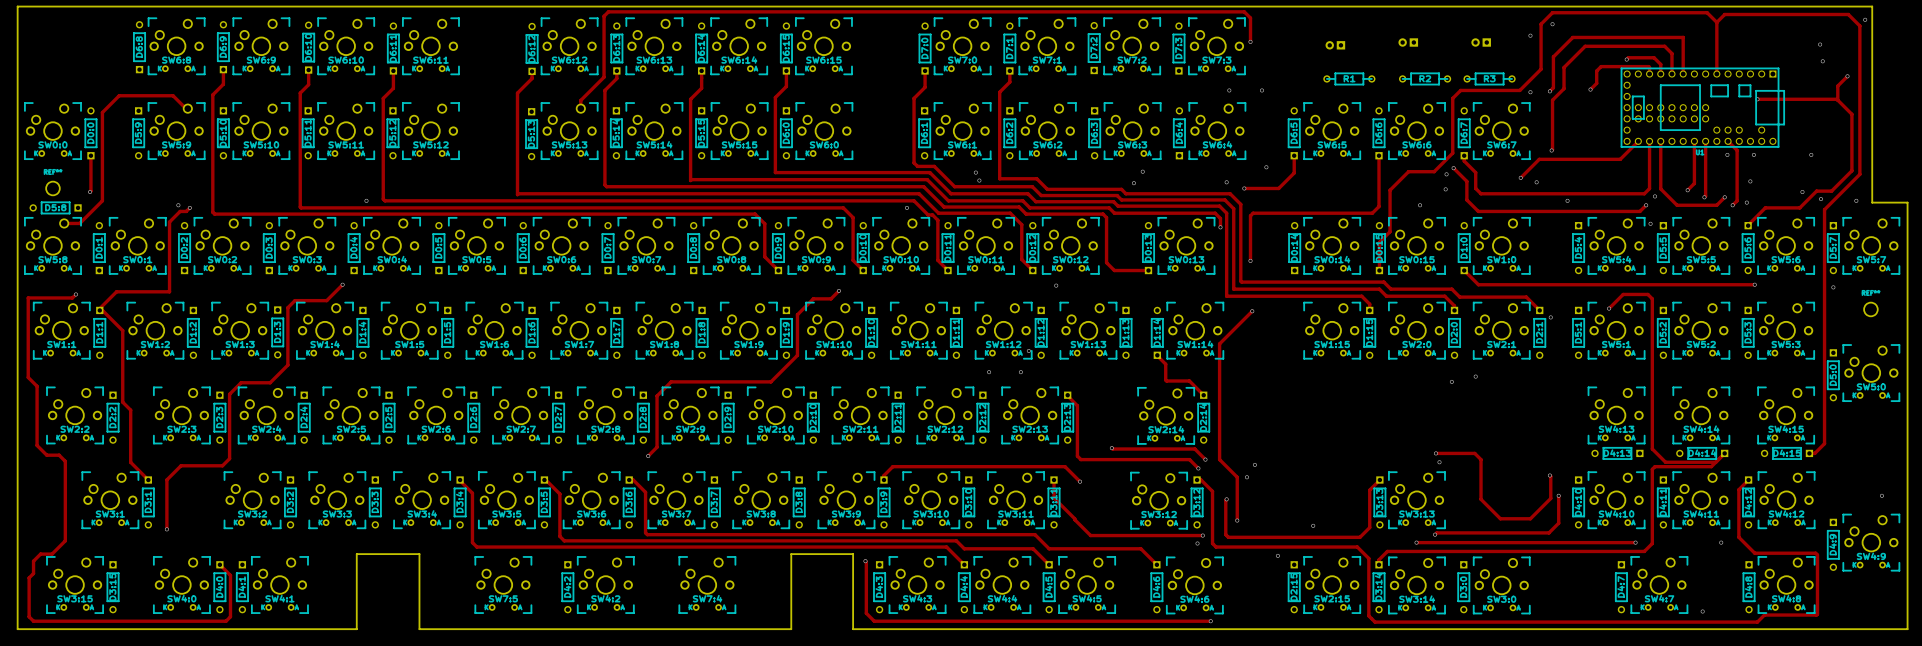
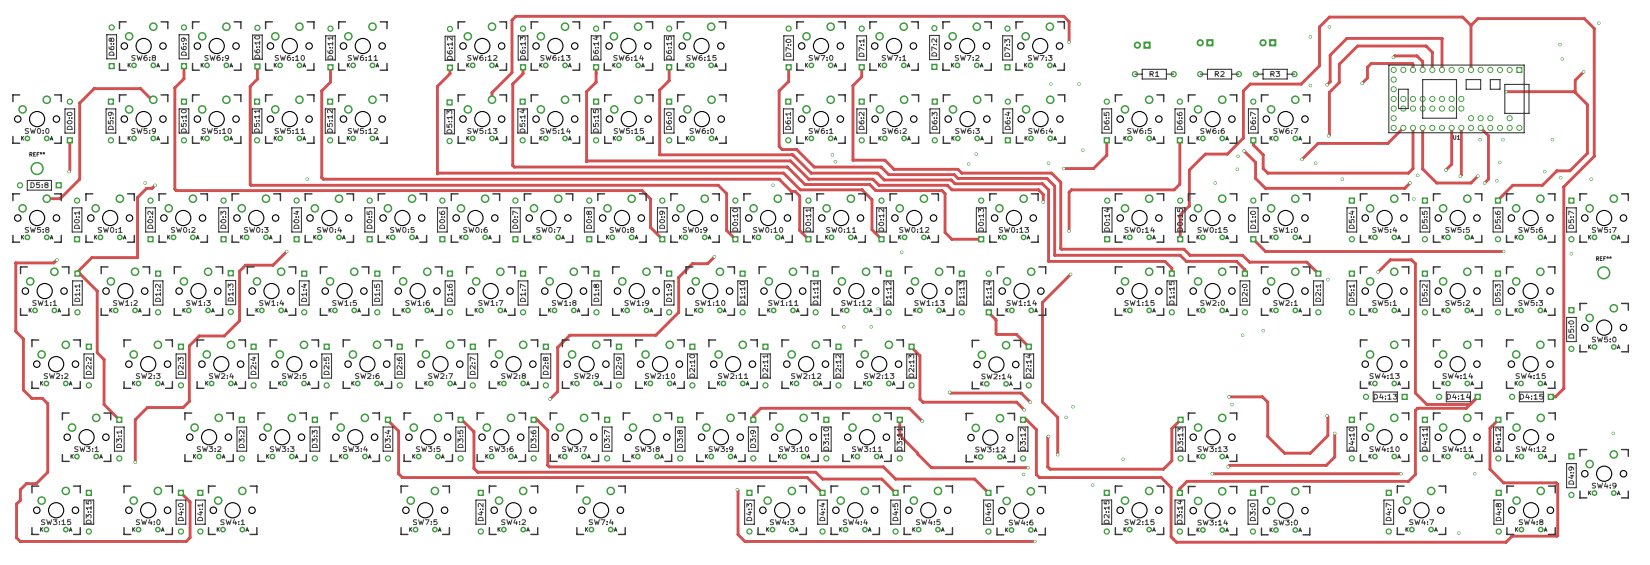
board edge: (17, 6) (17, 629) (356, 629) (356, 554) (419, 554) (419, 629) (791, 629) (791, 554) (853, 554) (853, 629) (1907, 629) (1907, 202) (1872, 202) (1872, 6) (17, 6) -> none

